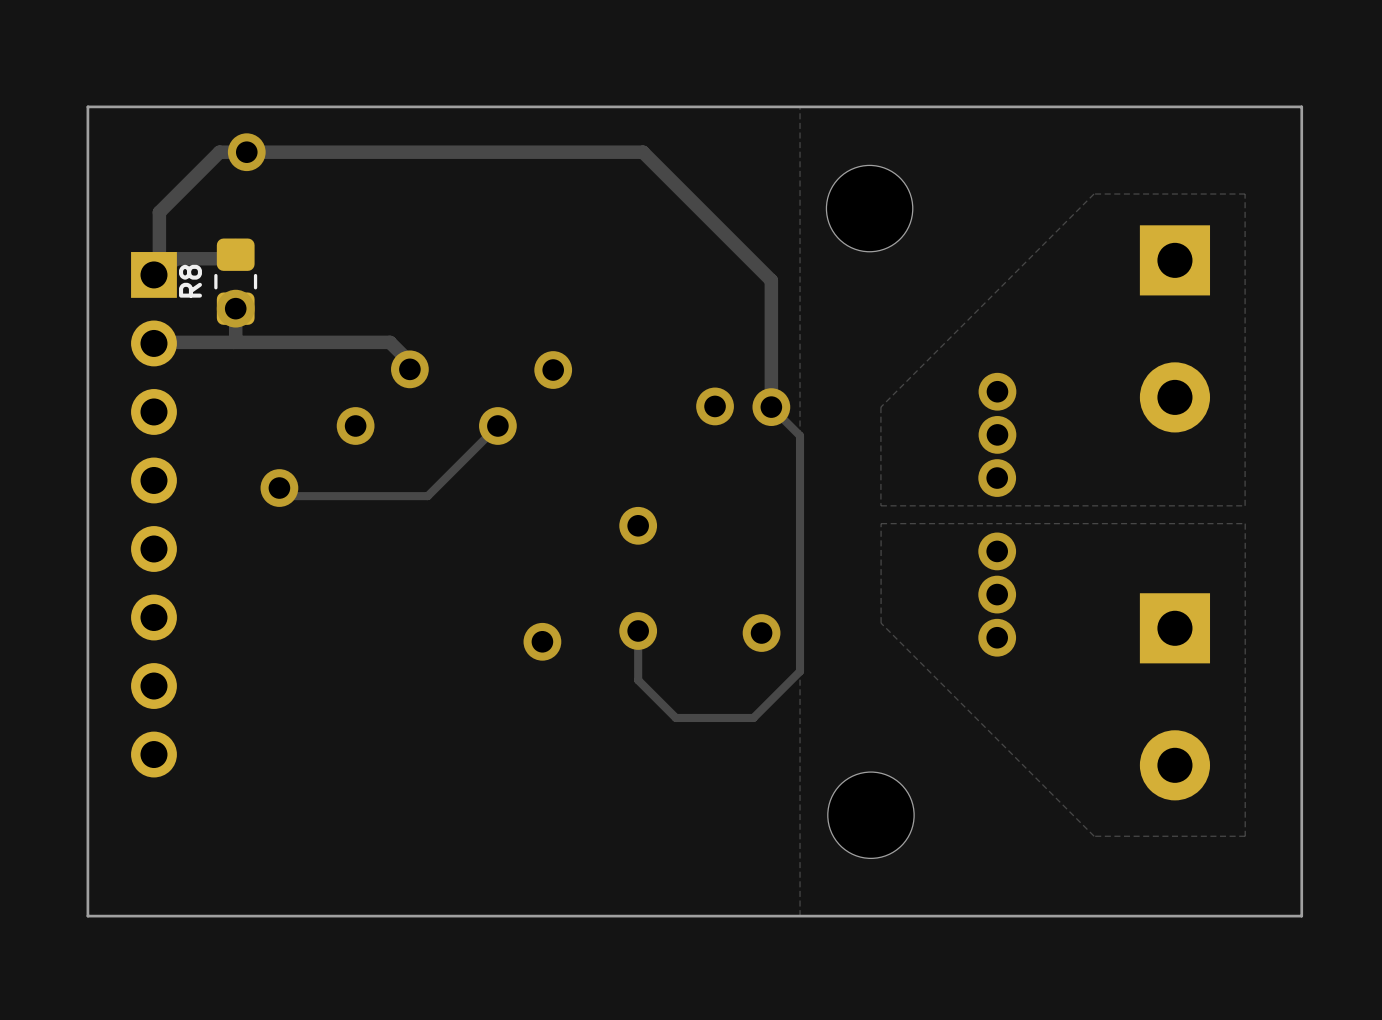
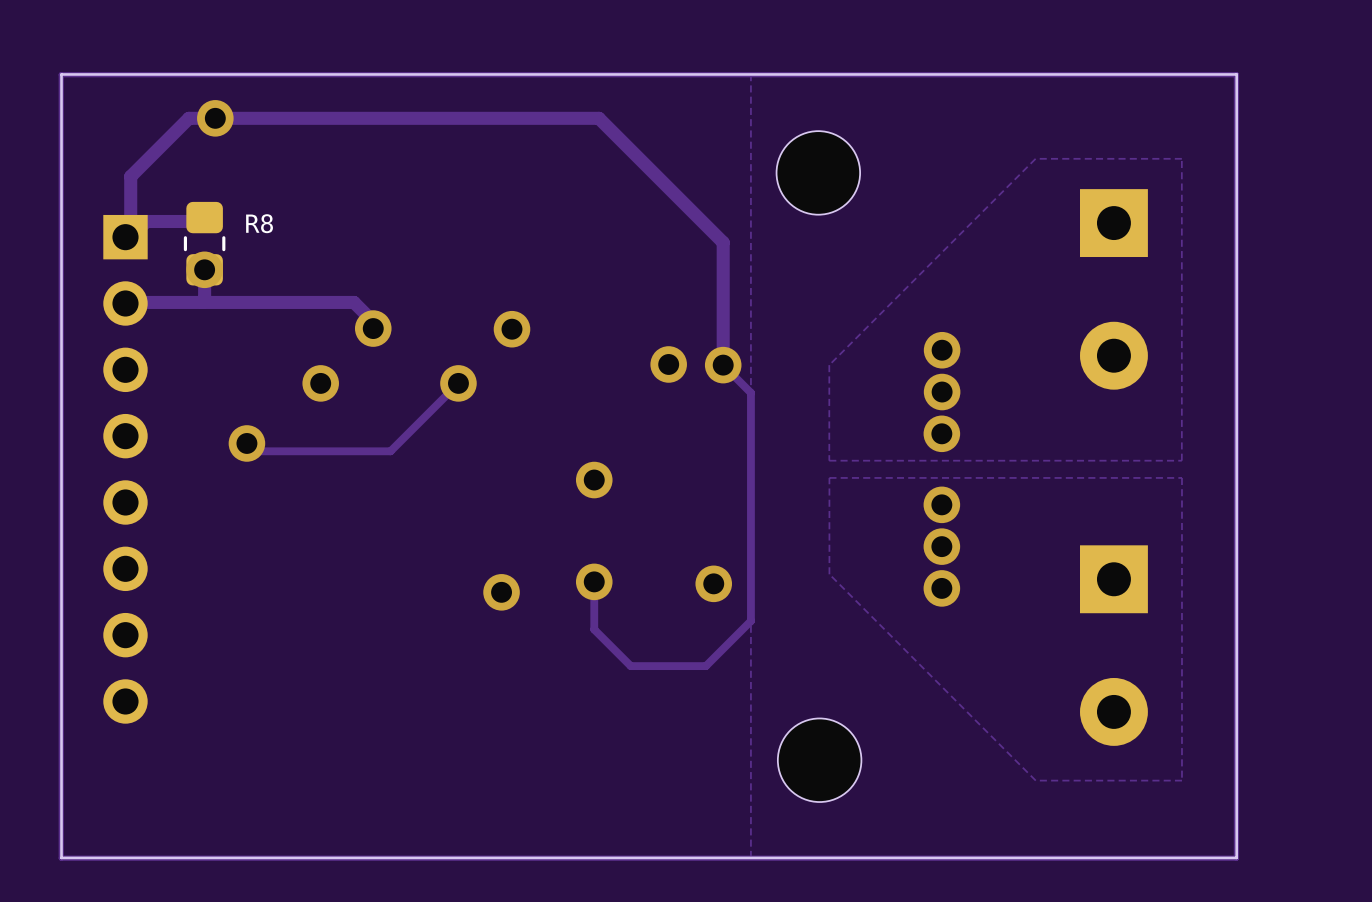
track: none -> (1236, 74) (1236, 858) (61, 858) (61, 74) (1236, 74)
R8 name rotation: 0° (190, 281) -> 90° clockwise (259, 223)
R8 name position: R8 (190, 281) -> R8 (259, 223)

